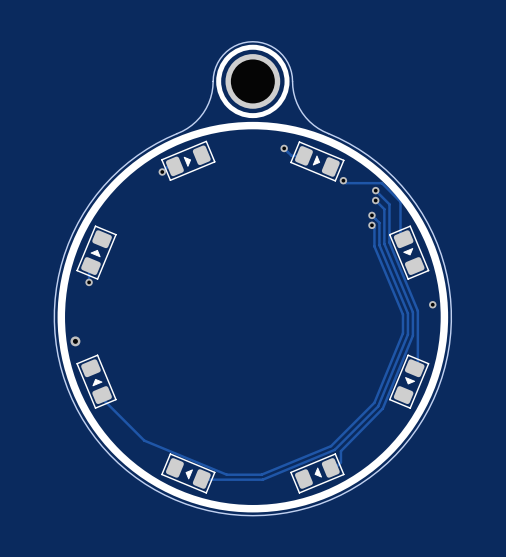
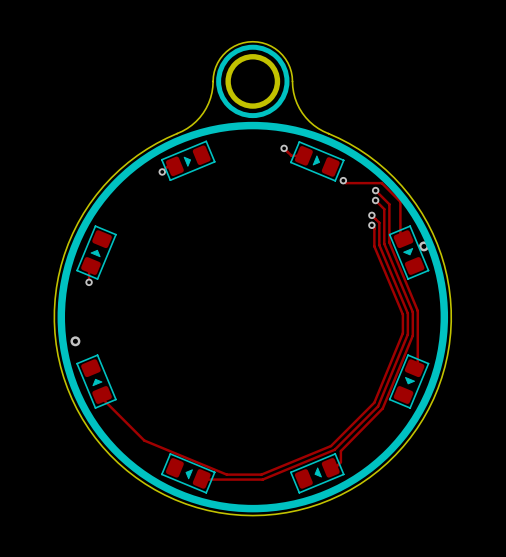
via: none -> (423, 246)
via: (432, 304) -> none

